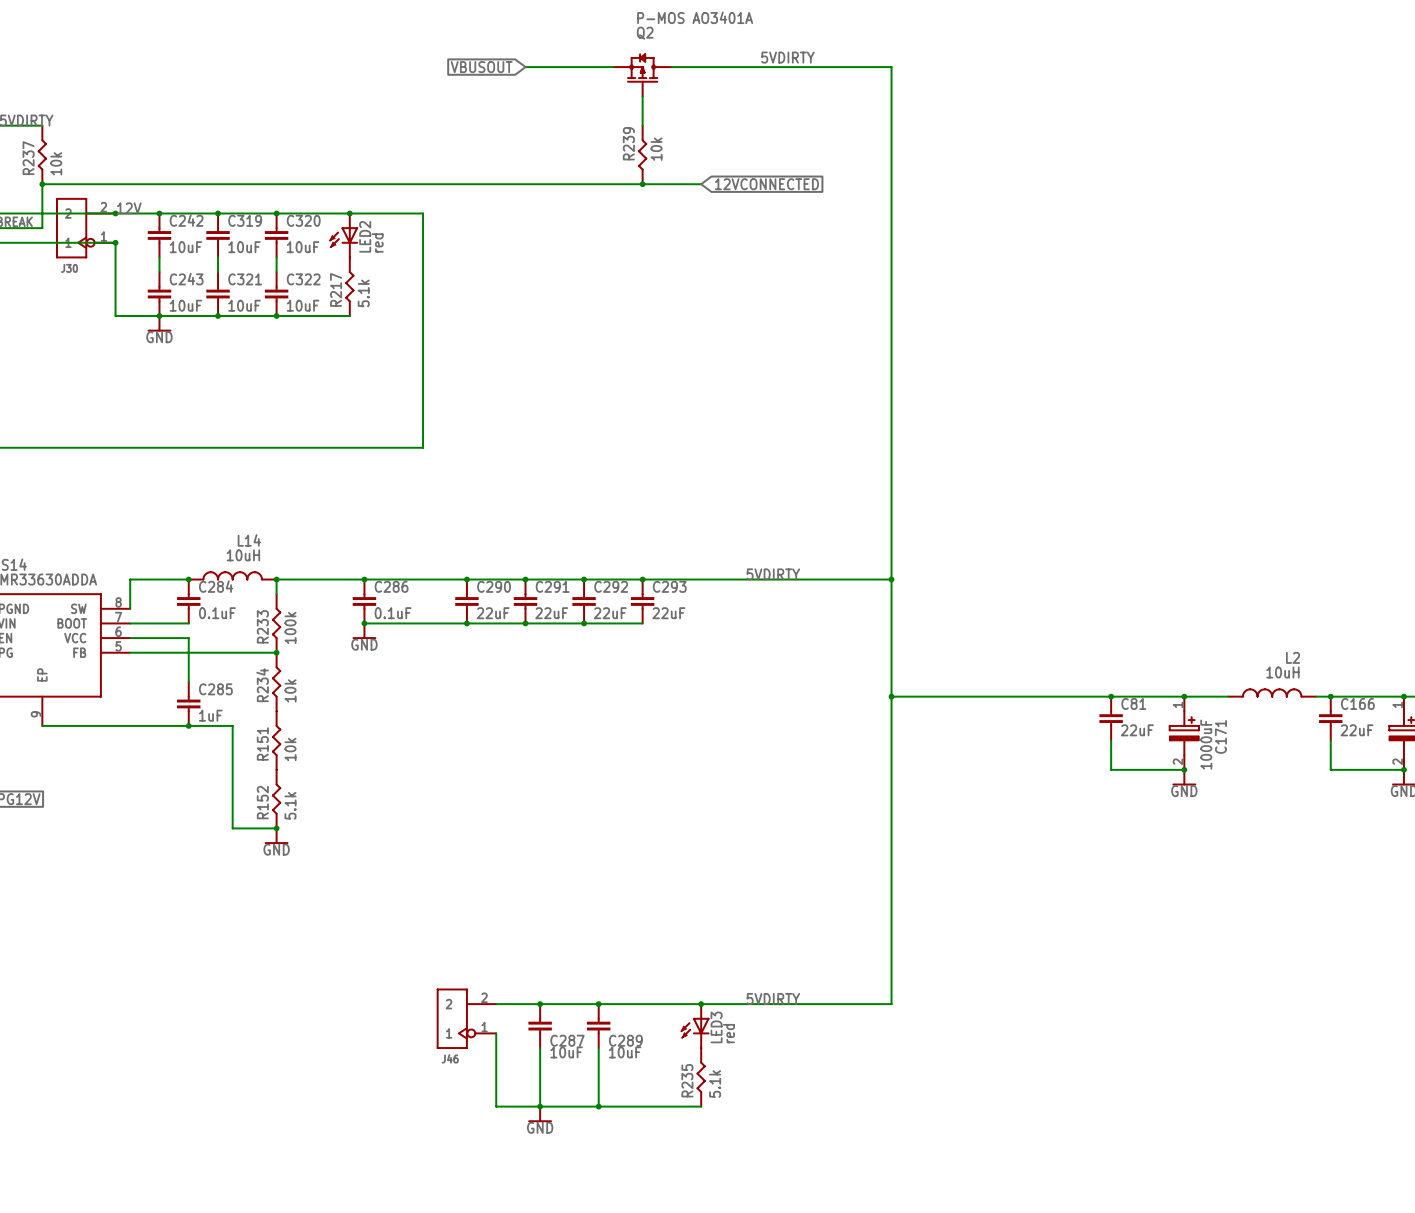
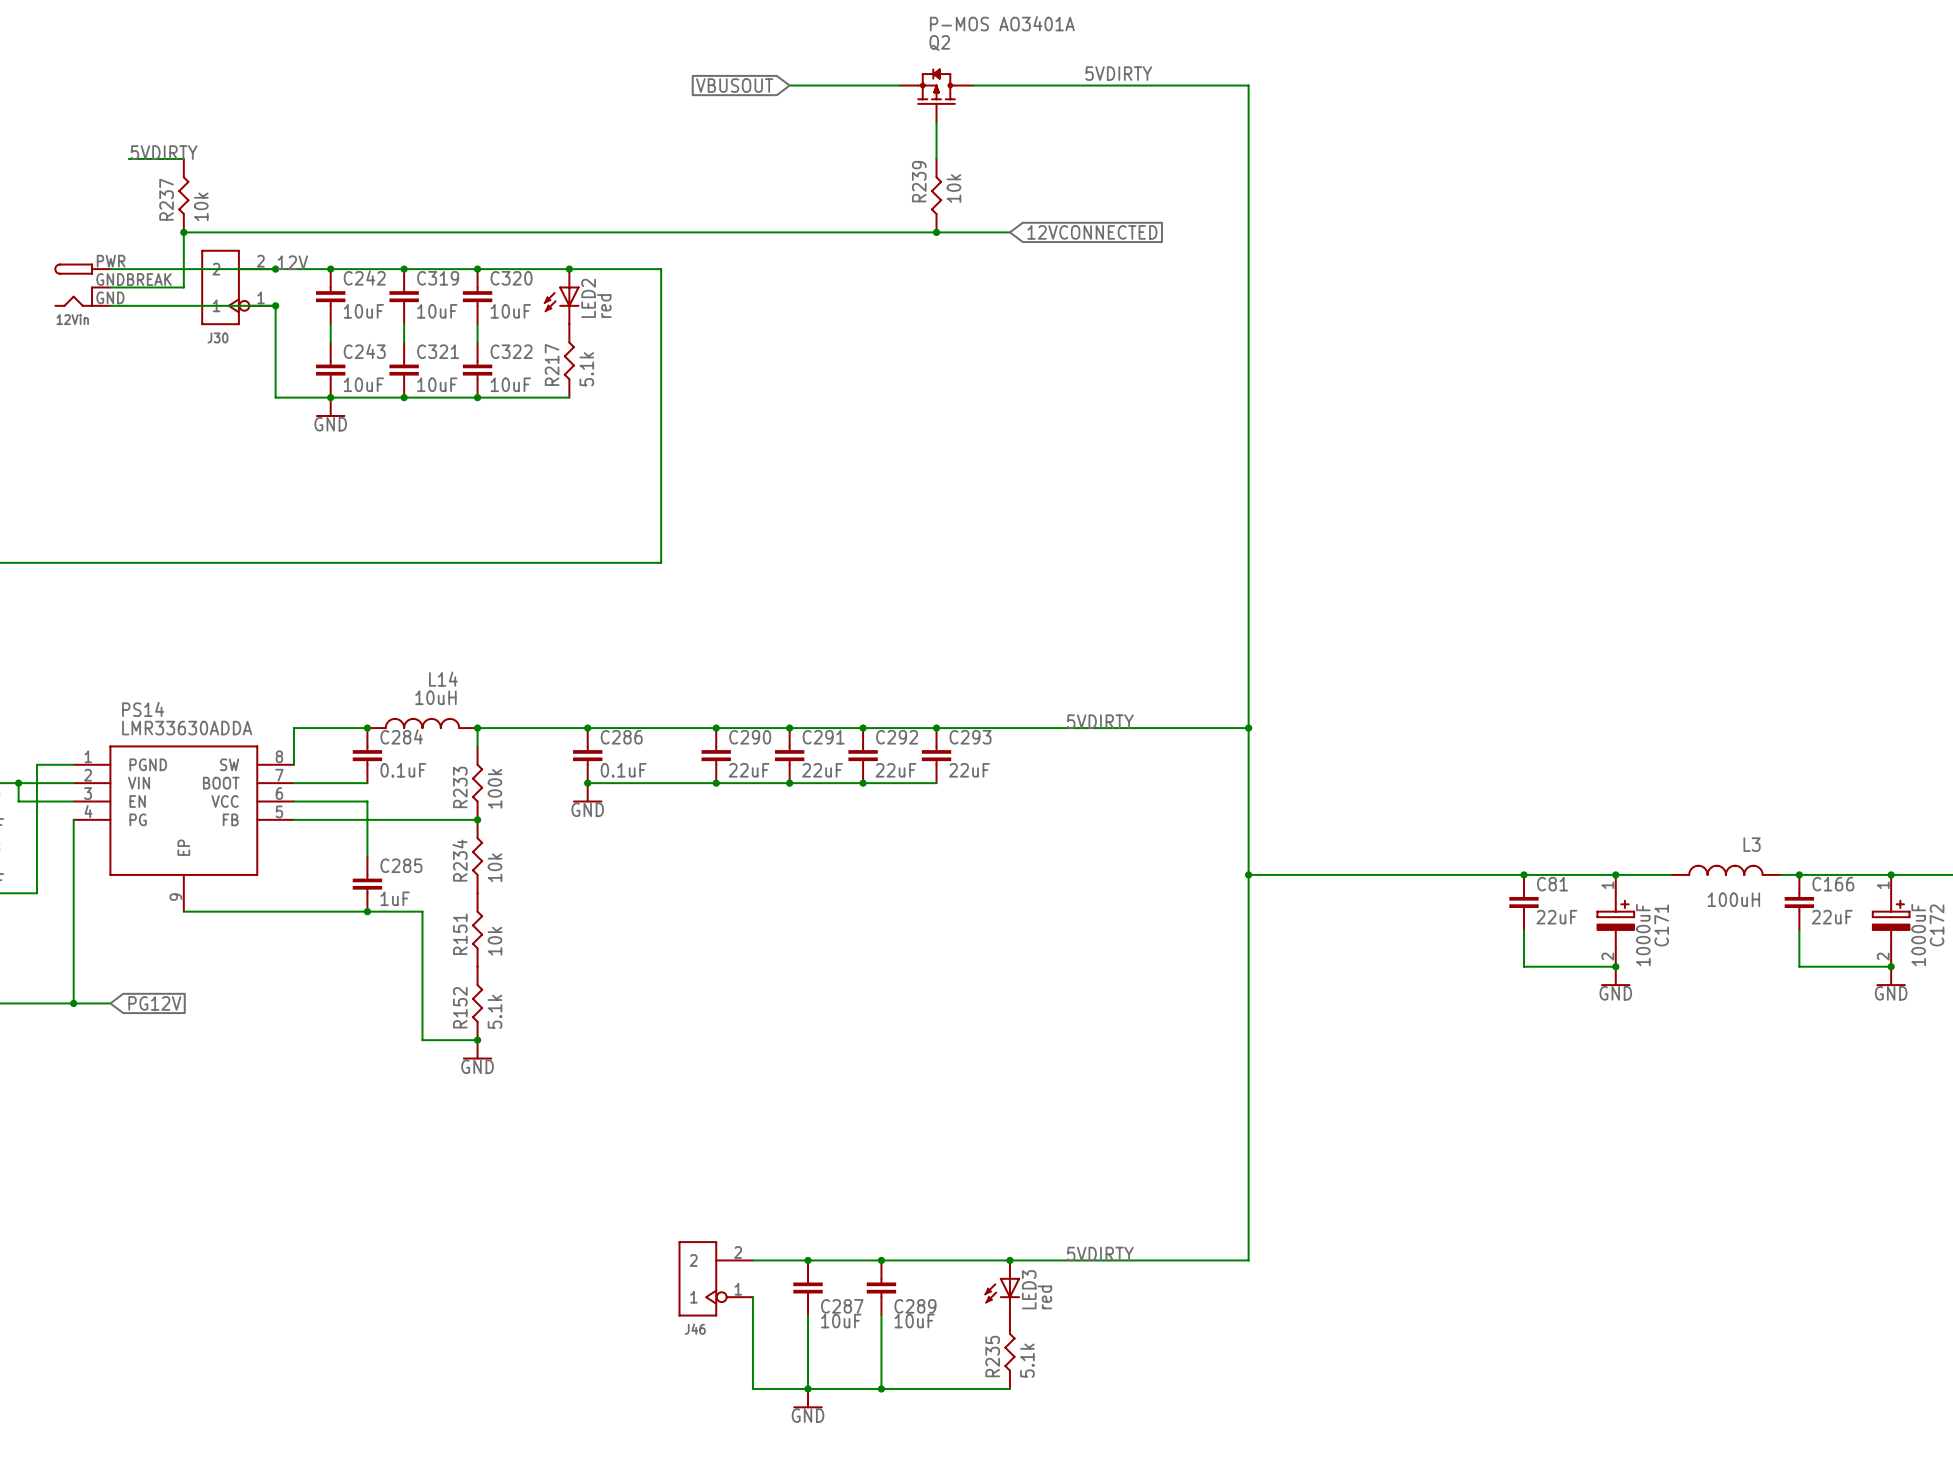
L2 name: L2 (1293, 657) -> L3 (1752, 844)
L2 value: 10uH (1282, 672) -> 100uH (1733, 899)

